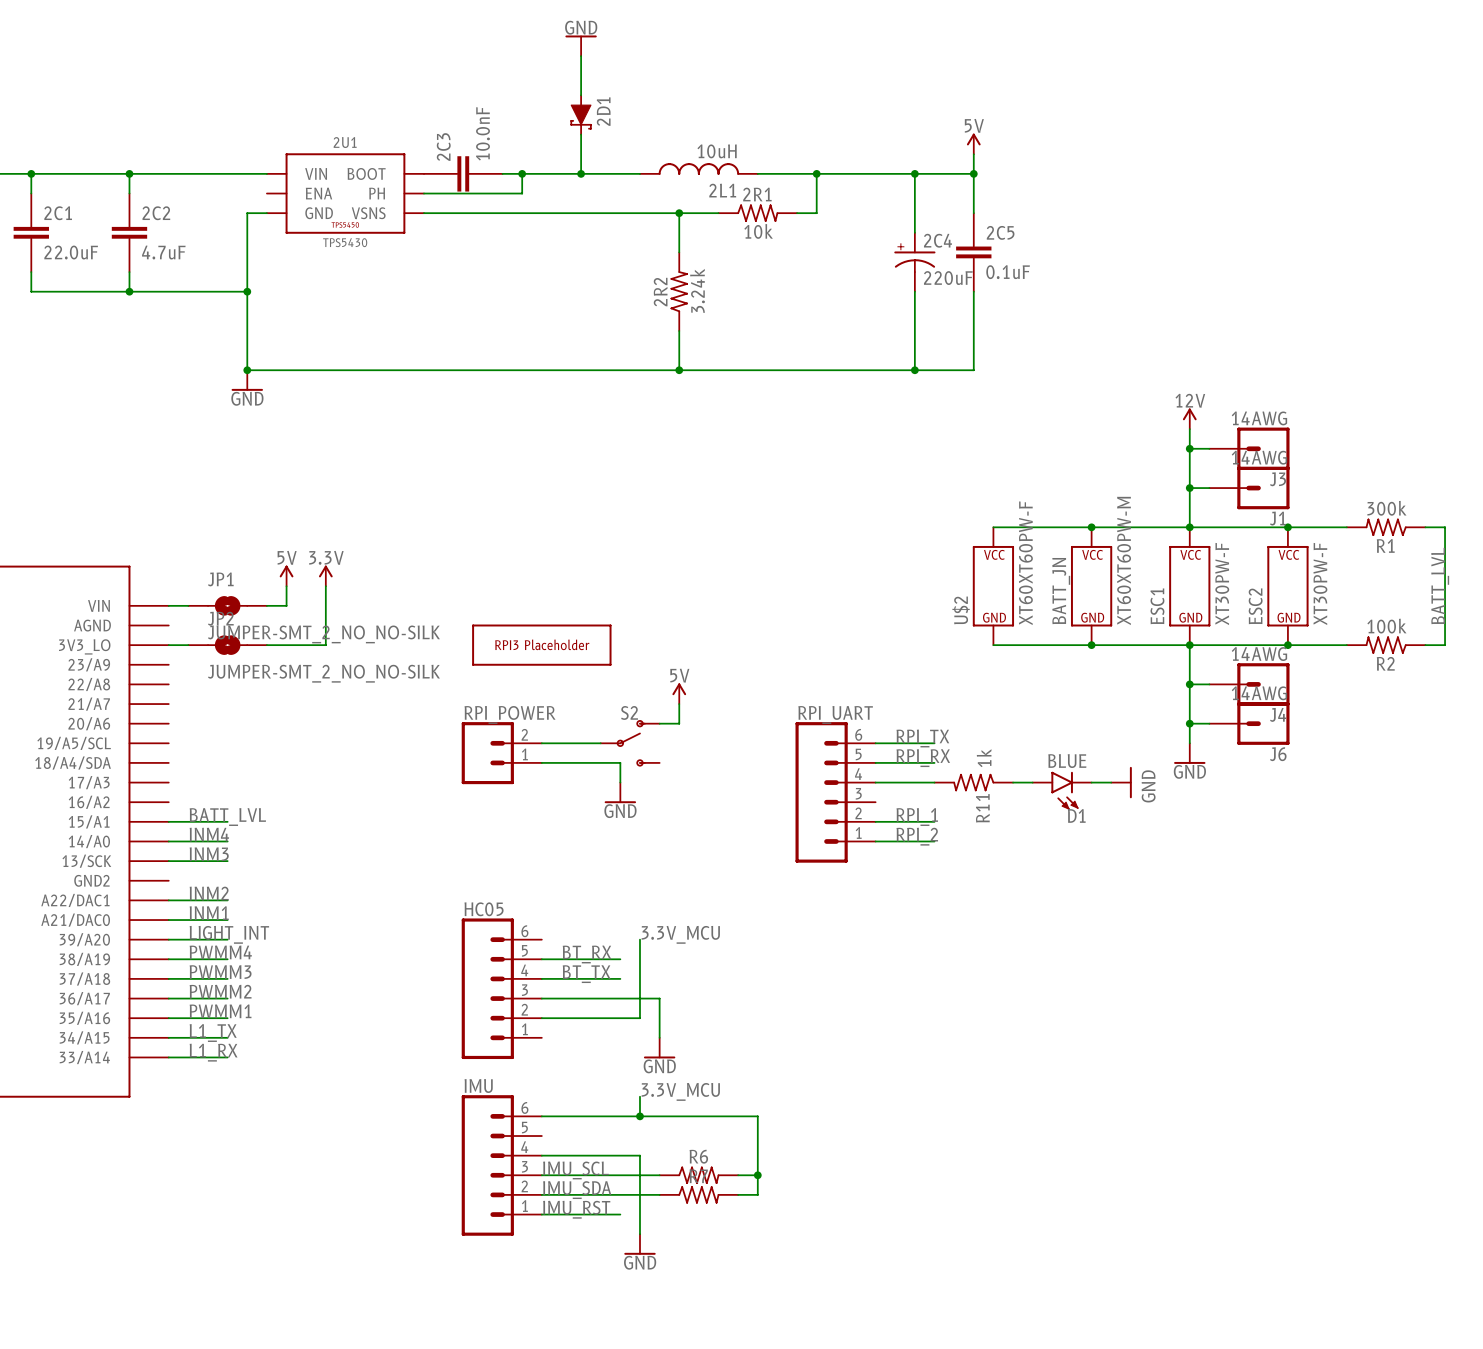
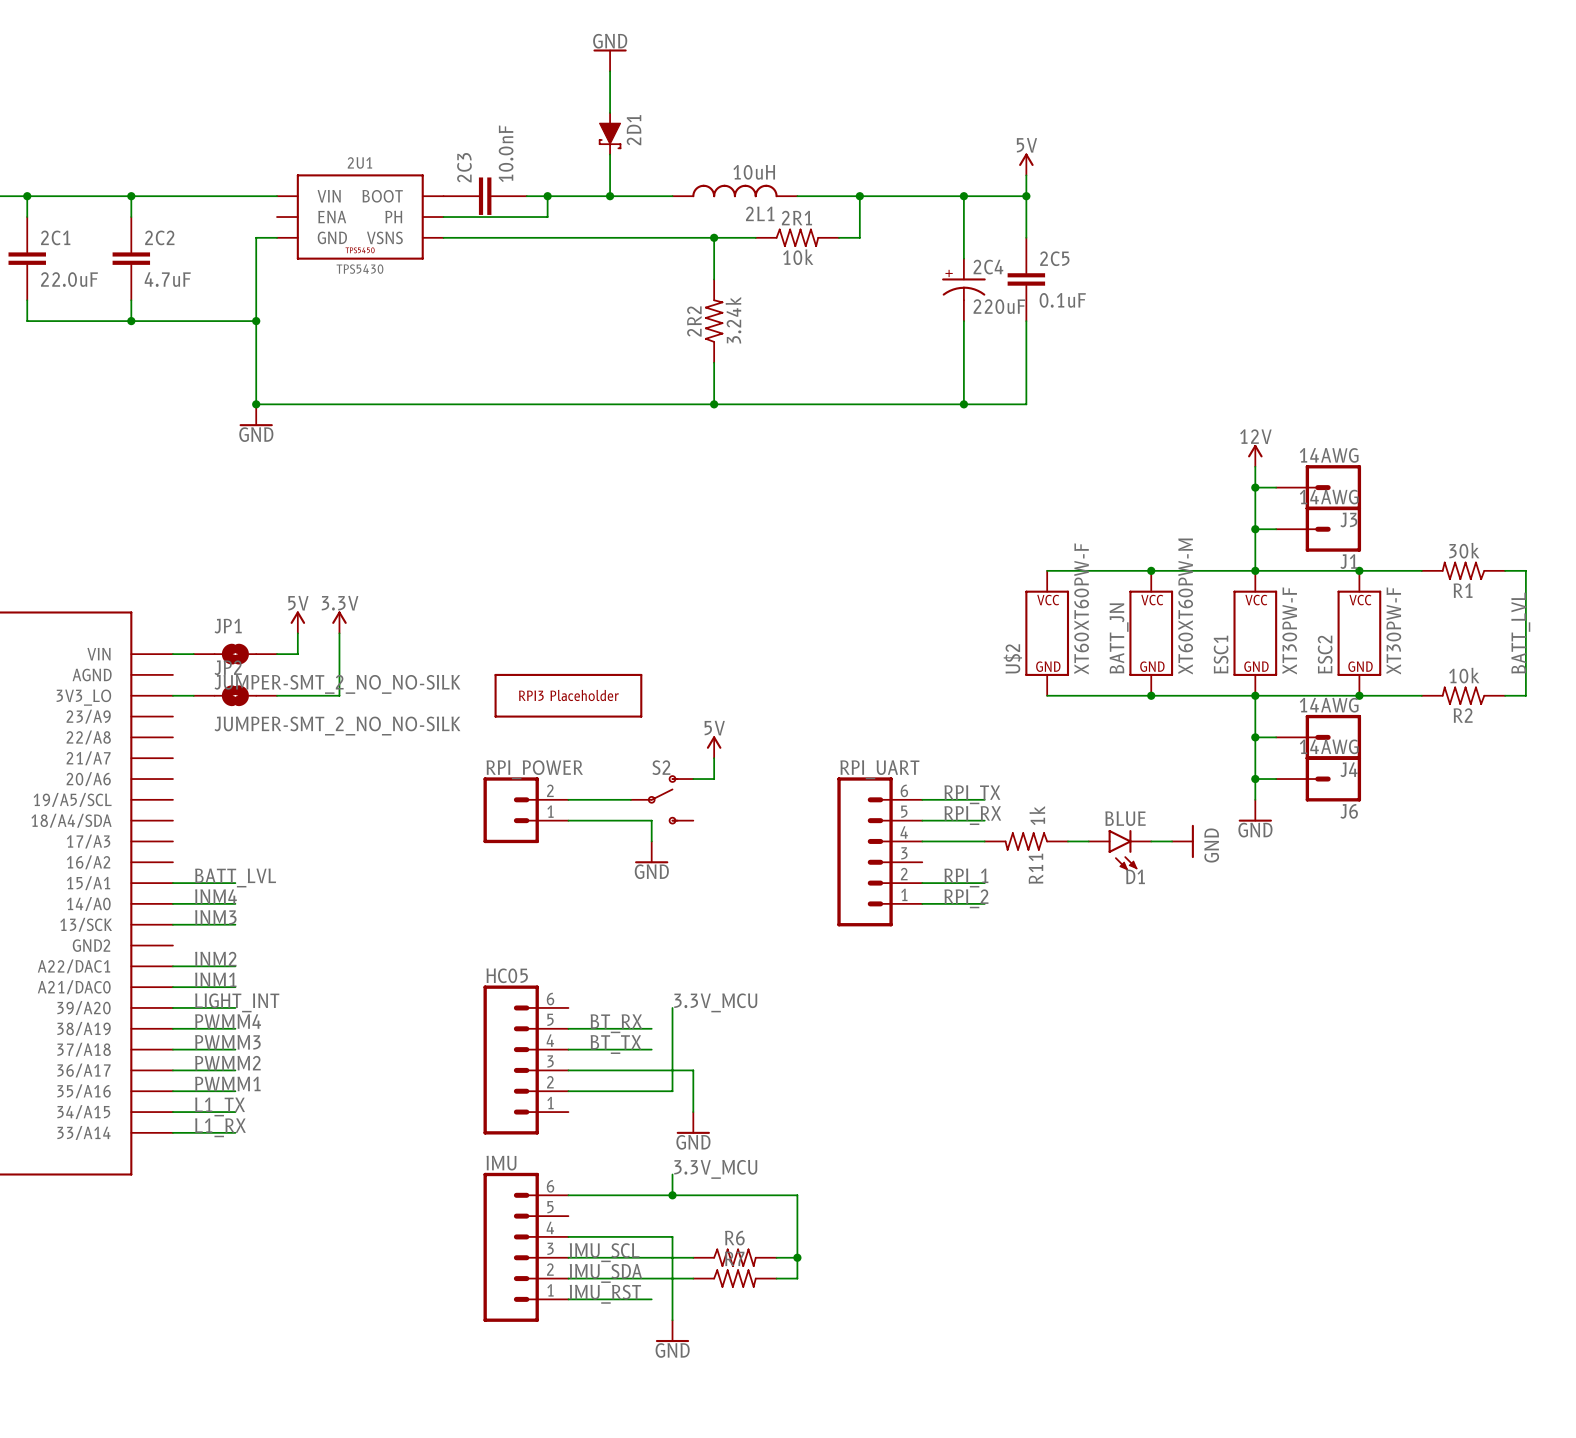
R1 value: 300k (1386, 508) -> 30k (1464, 550)
R2 value: 100k (1386, 626) -> 10k (1464, 675)

